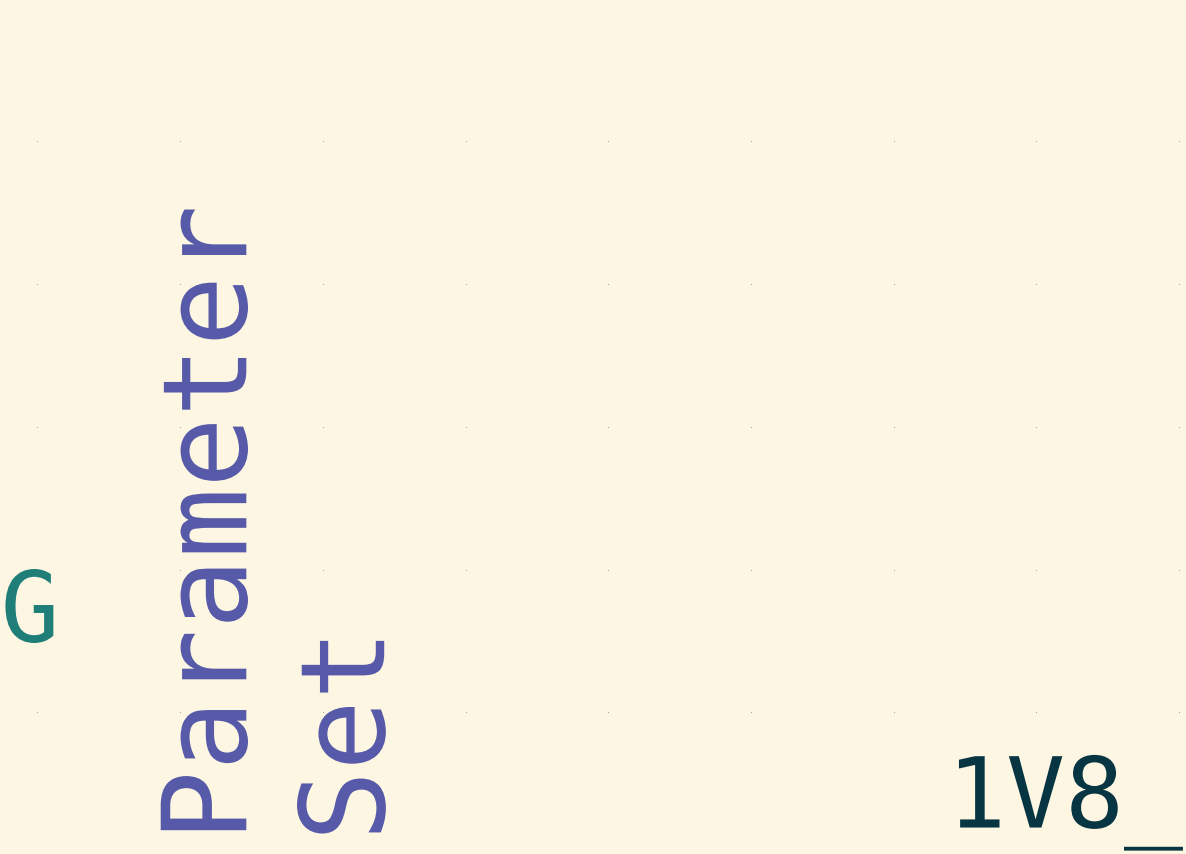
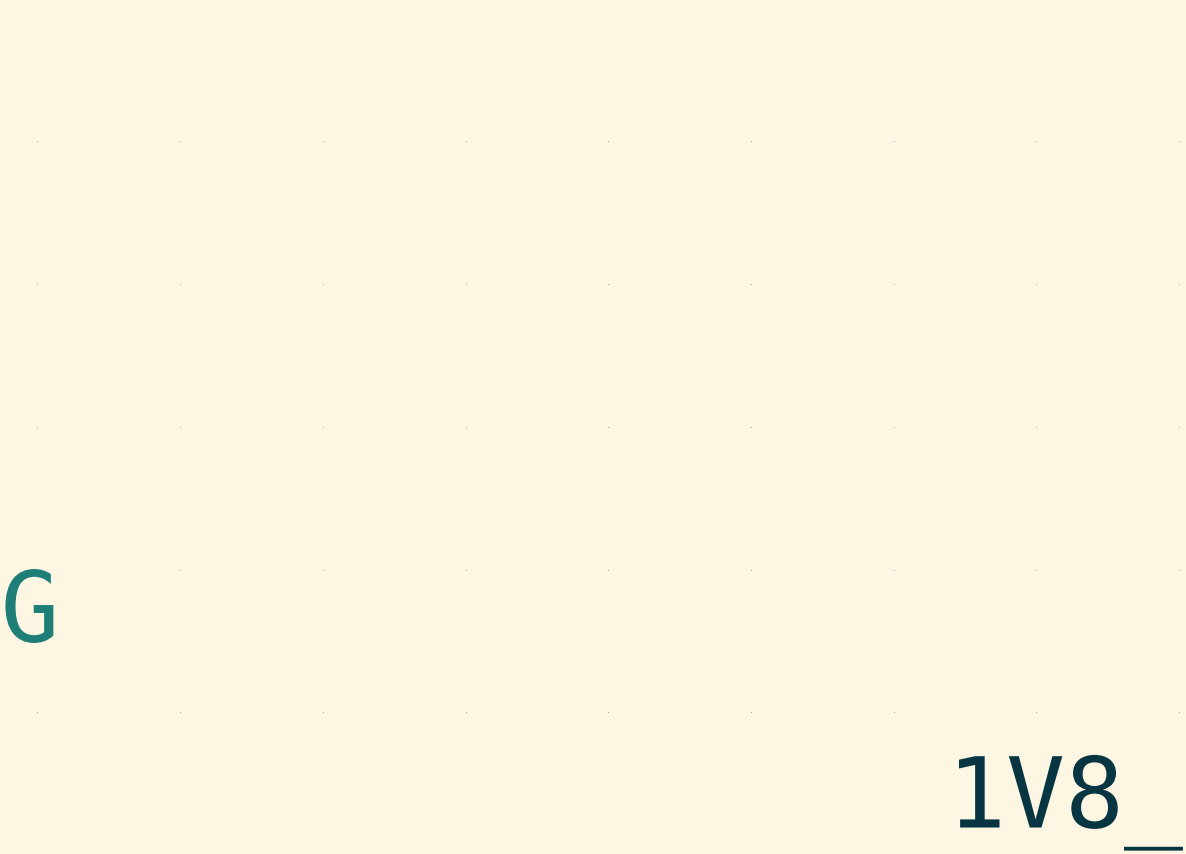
text: Parameter (204, 519) -> none
text: Set (341, 737) -> none

